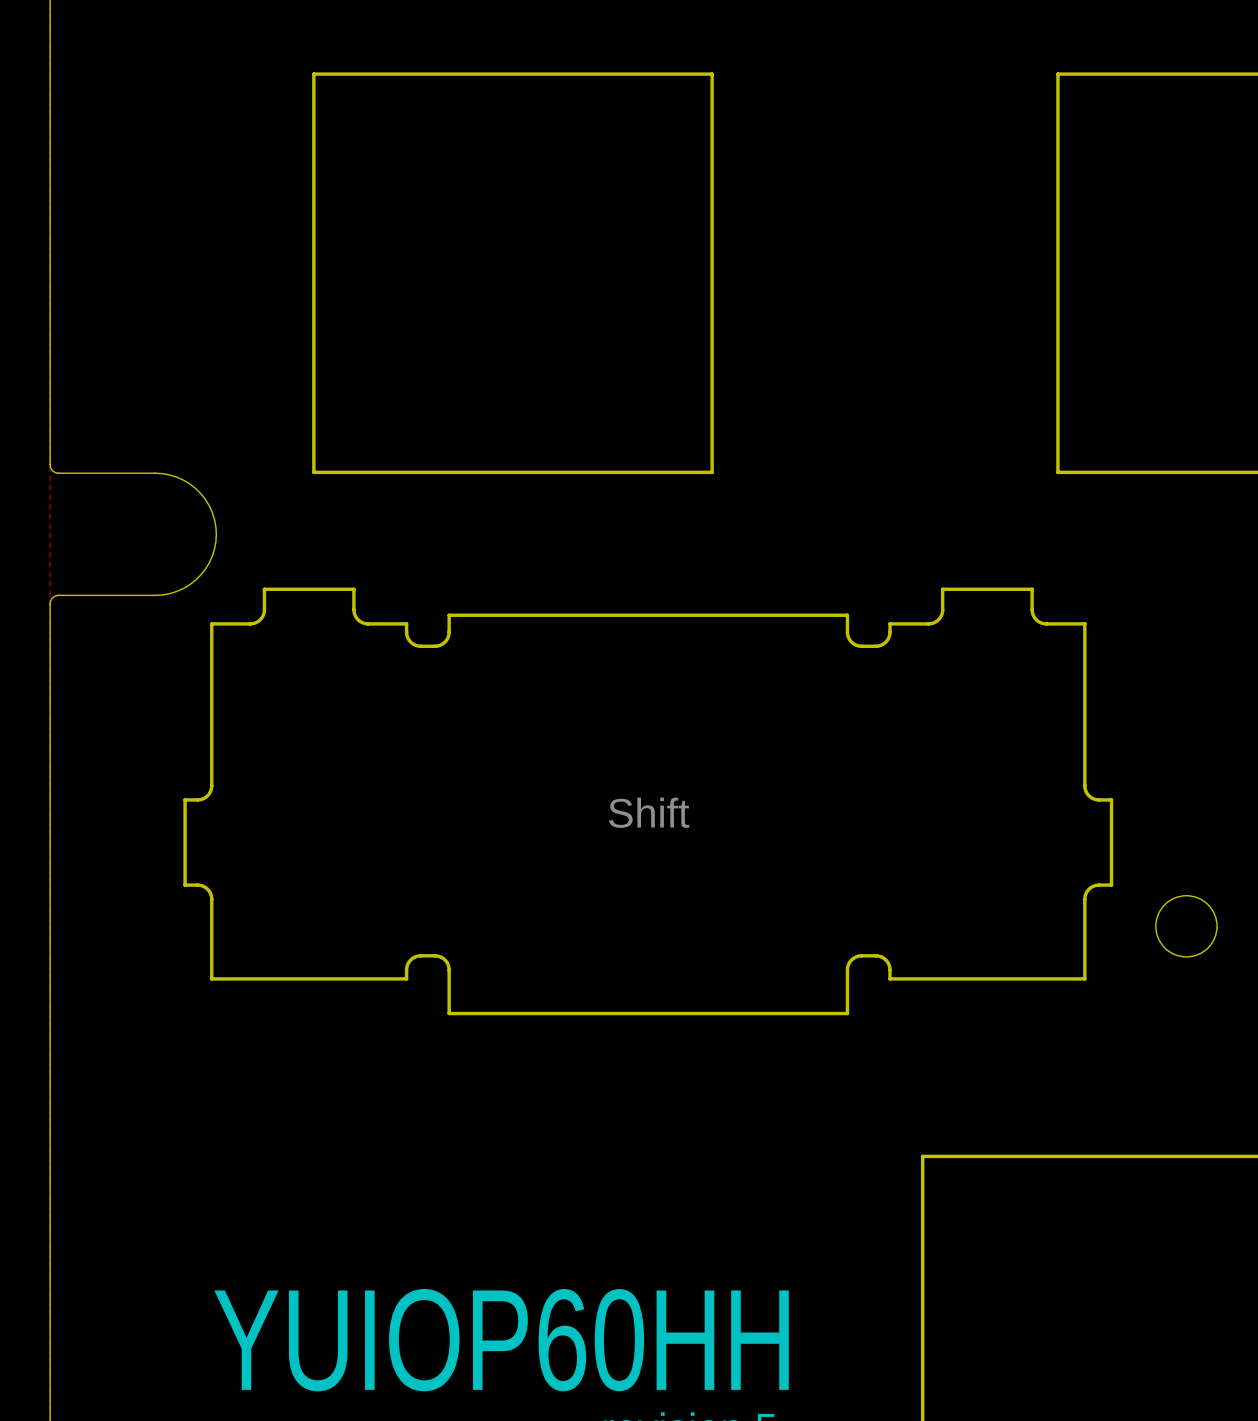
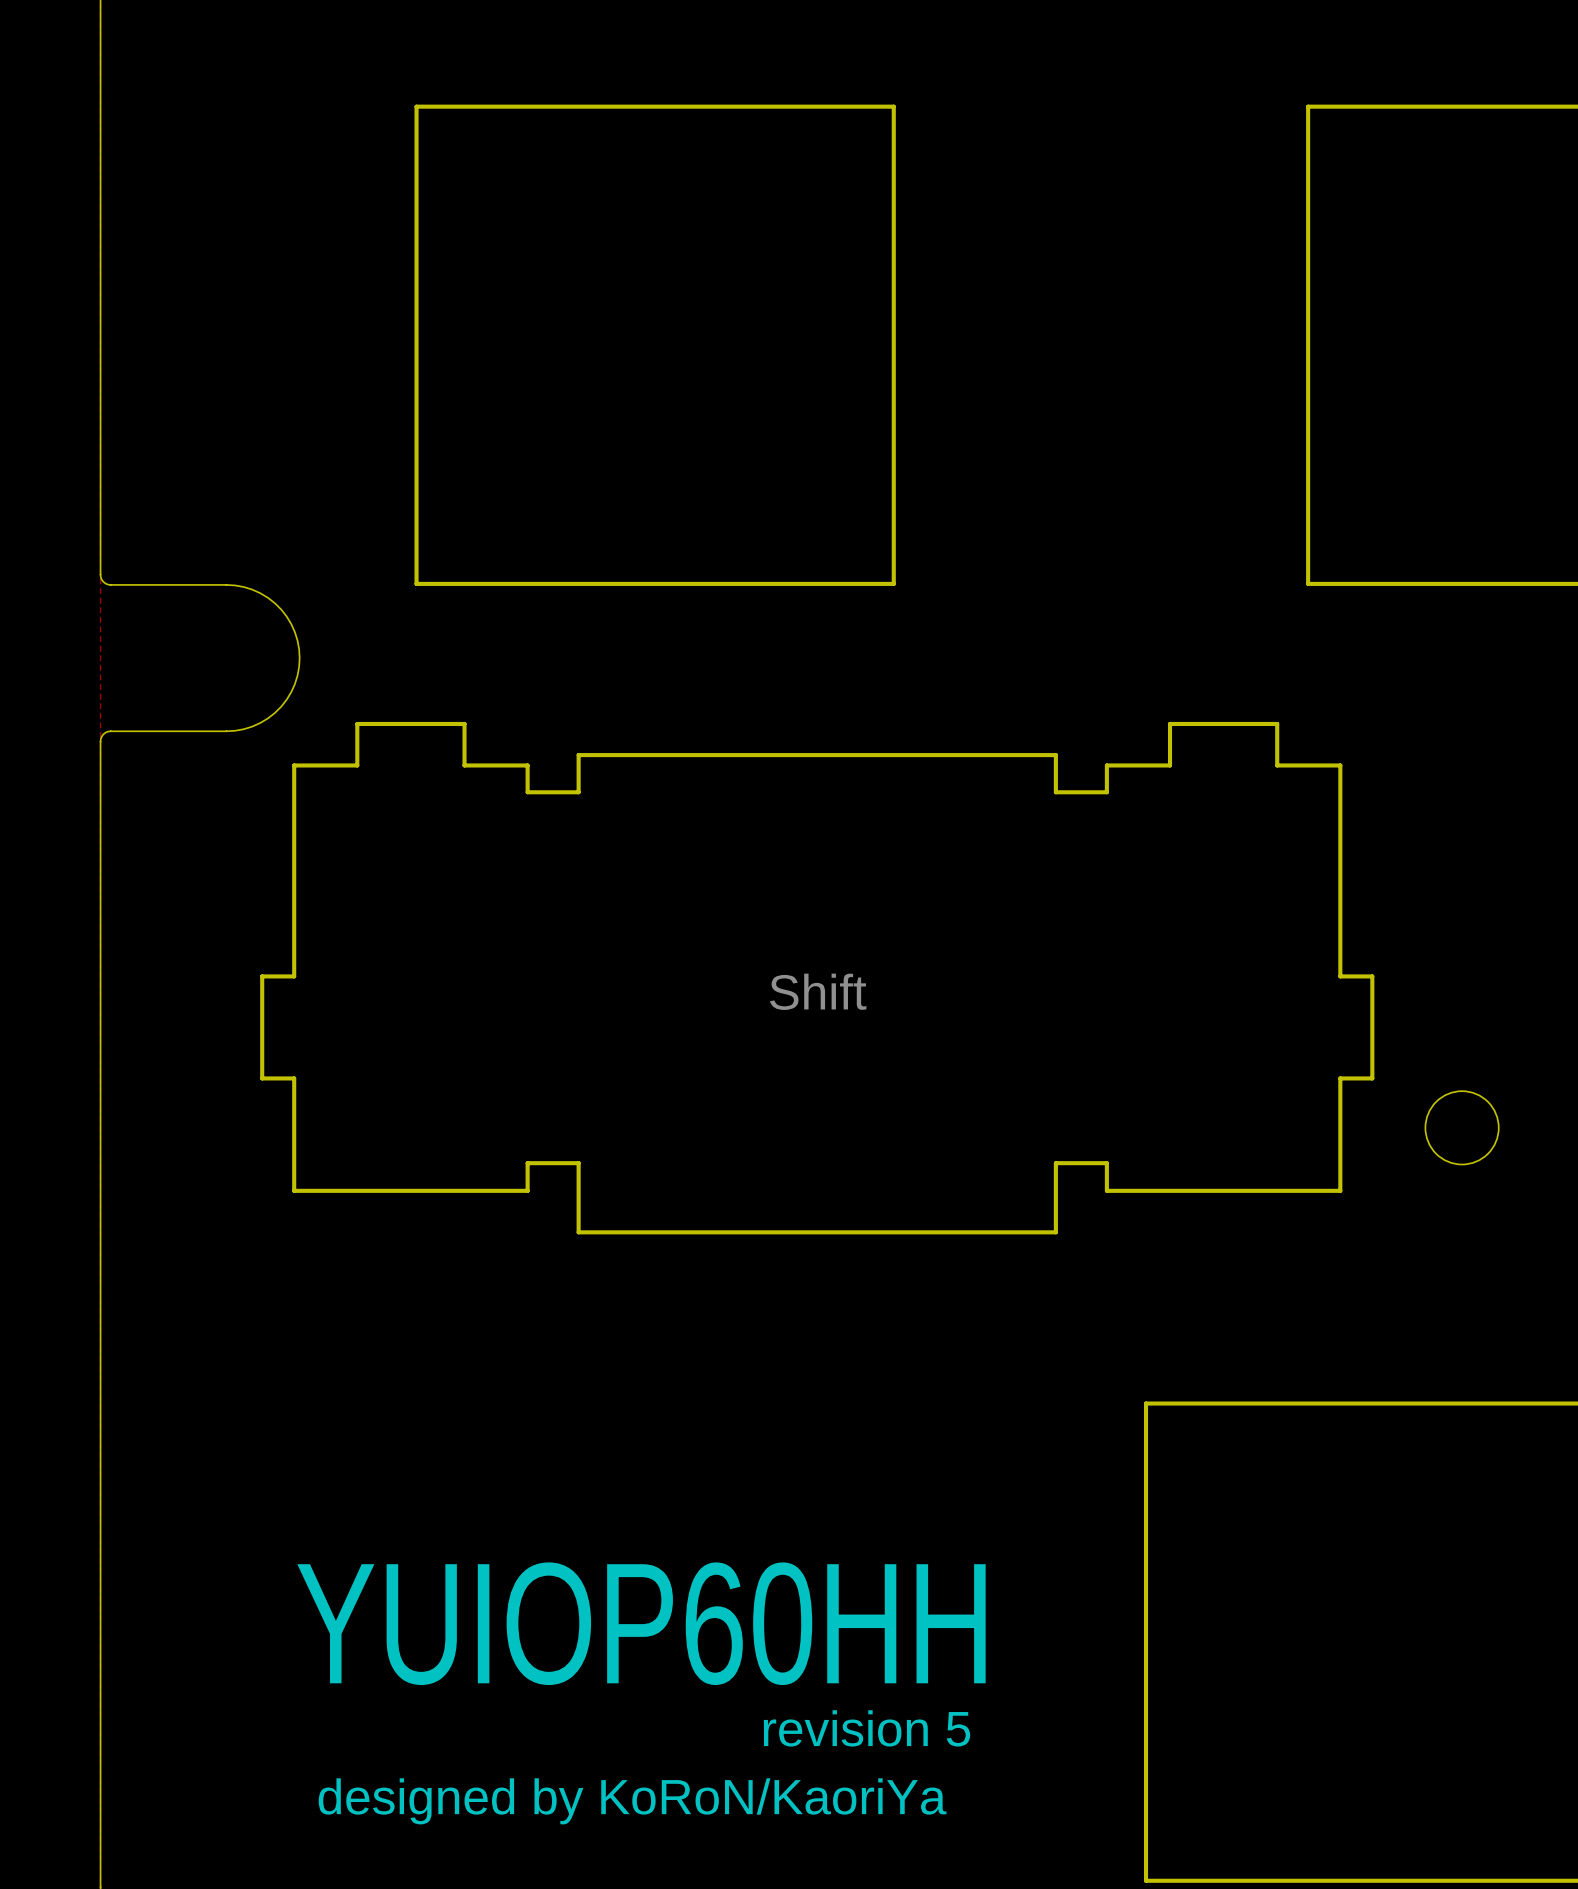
drawing shape: [183, 587, 1114, 1016] -> [260, 721, 1375, 1235]

